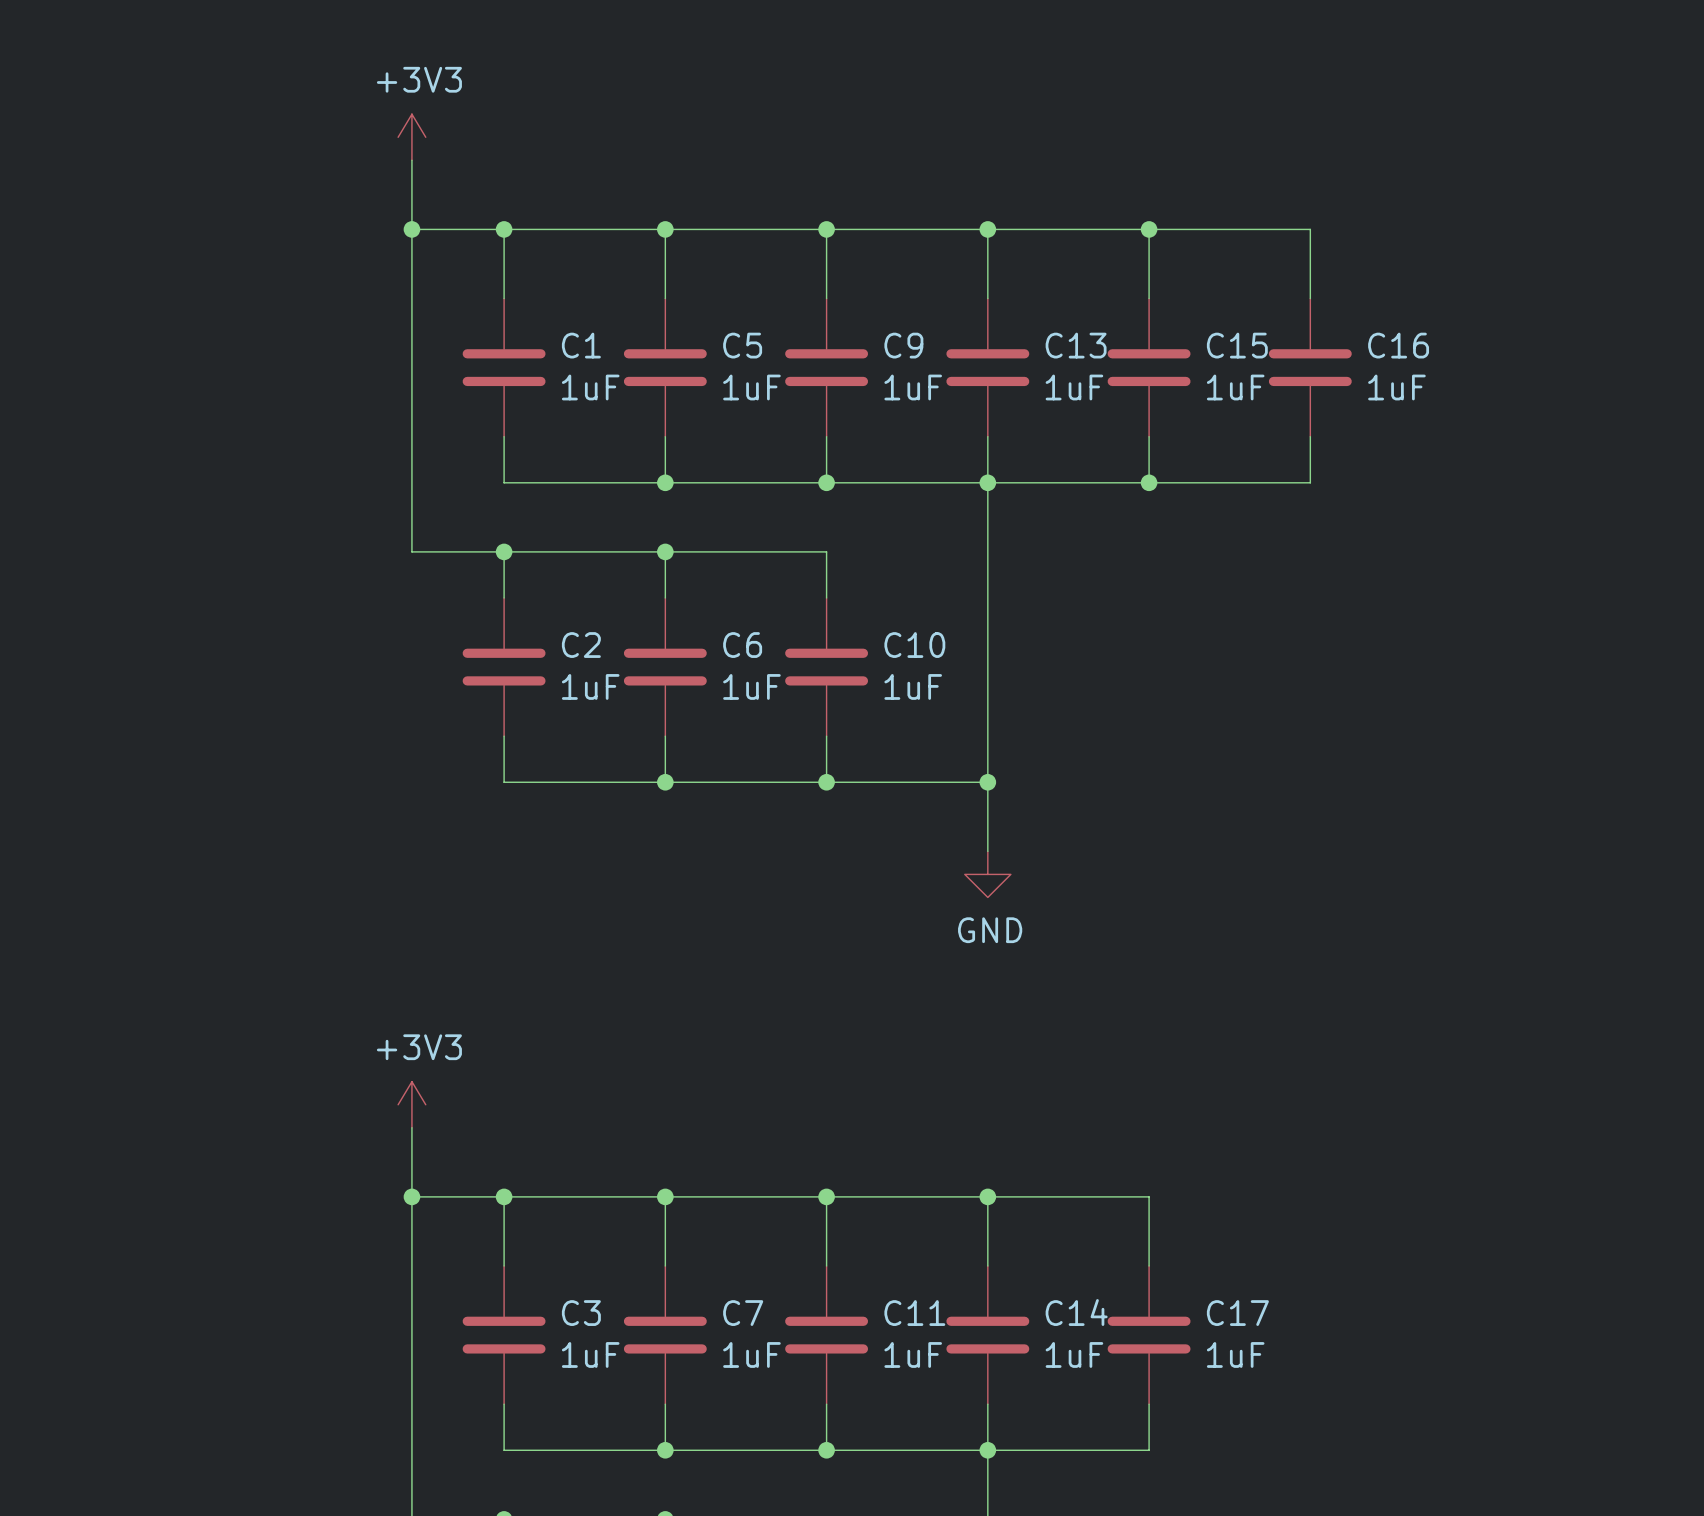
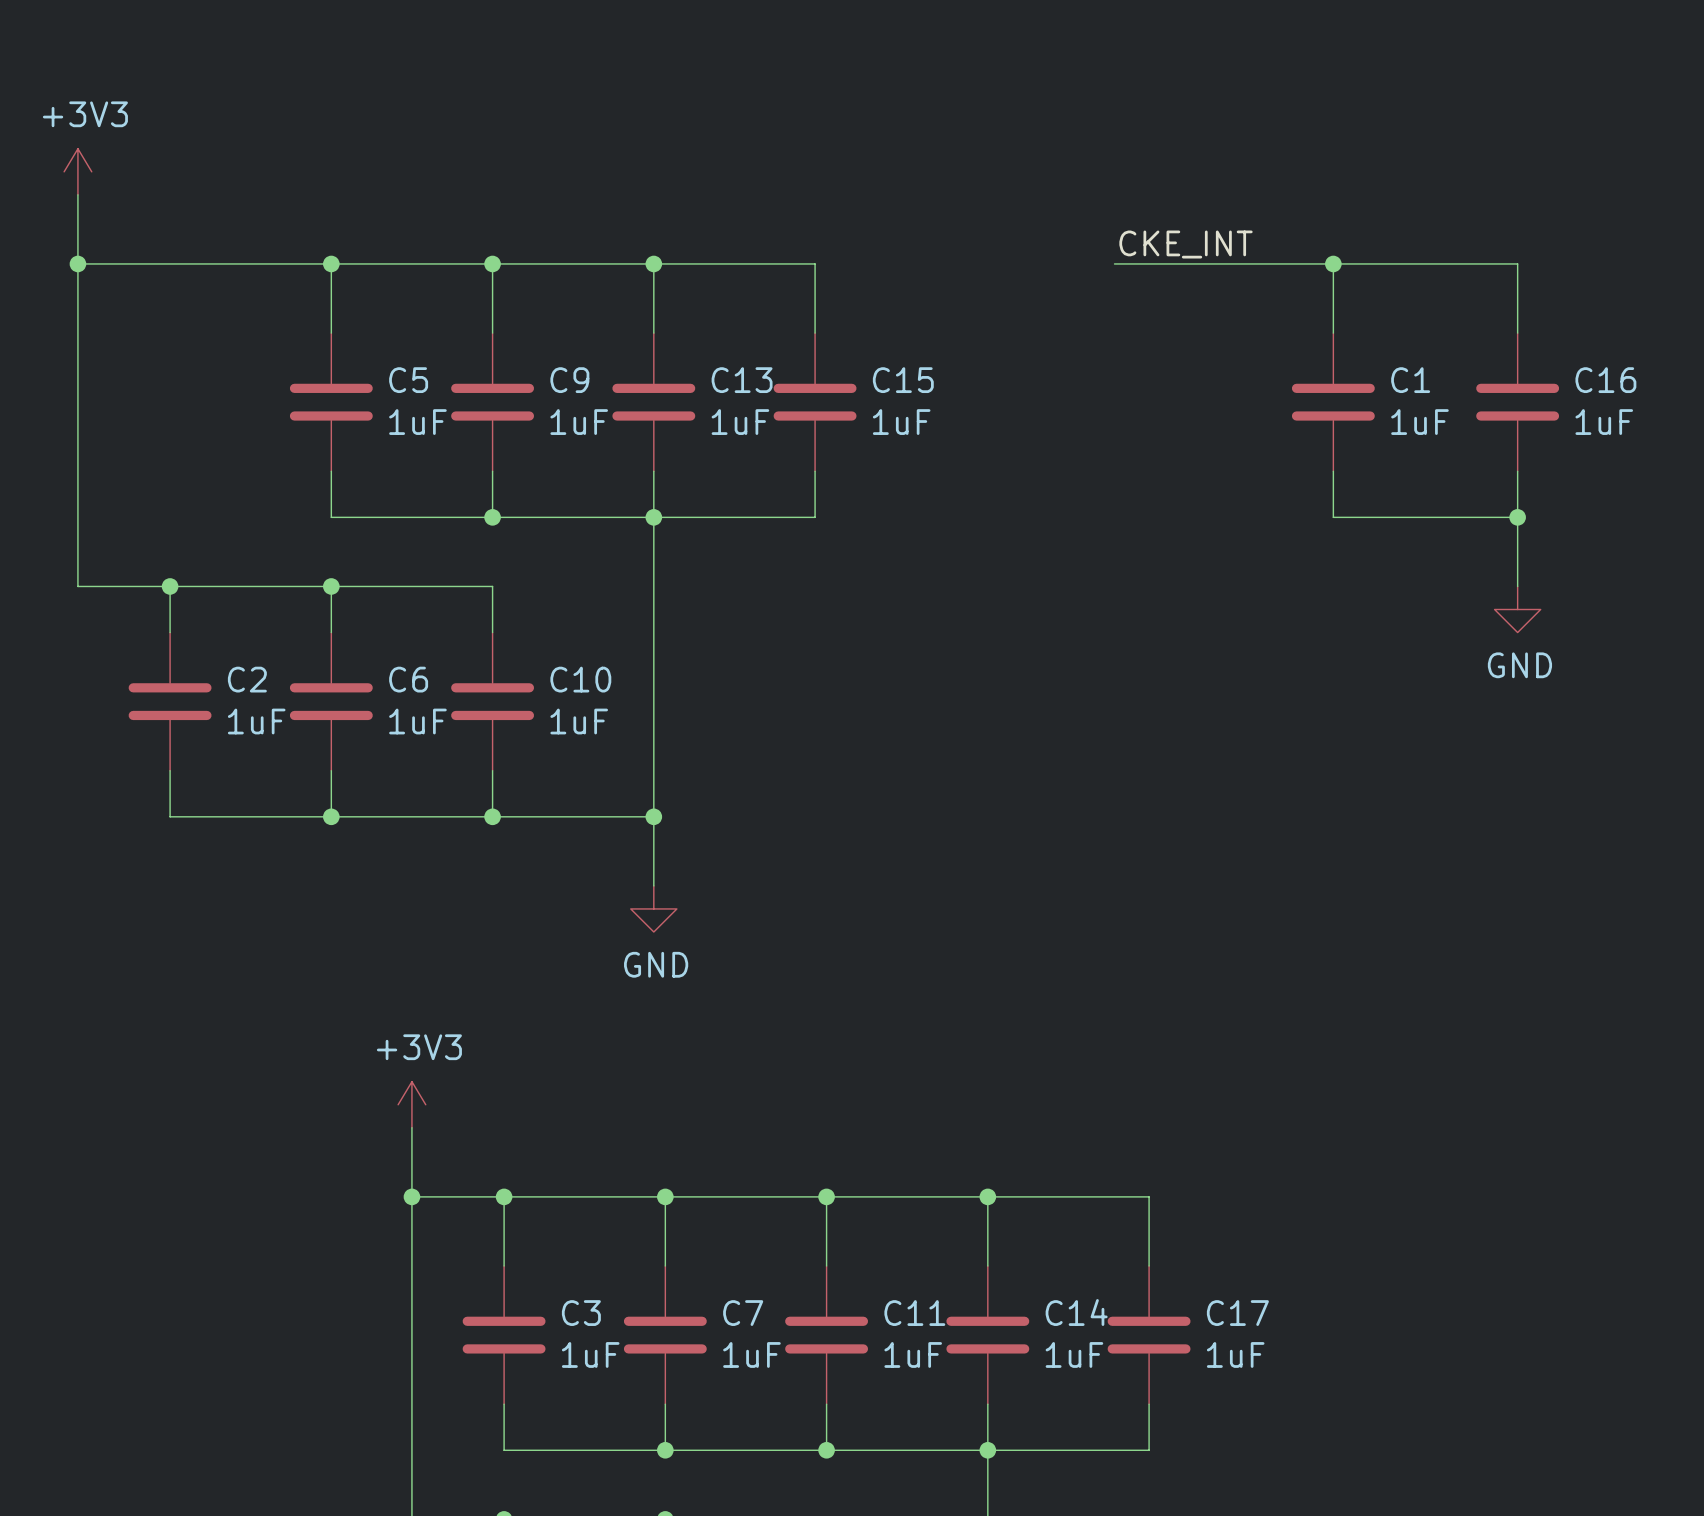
power symbol position: +3V3 (411, 137) -> +3V3 (77, 171)
wire: (411, 160) (411, 551) (826, 551) (826, 597) -> (77, 194) (77, 586) (492, 586) (492, 632)
wire: (411, 229) (1310, 229) (1310, 298) -> none
junction: (411, 229) -> none
wire: (504, 229) (504, 298) -> none
junction position: (504, 229) -> (492, 263)
wire: (665, 229) (665, 298) -> (331, 263) (331, 333)
junction position: (665, 229) -> (653, 263)
wire: (826, 229) (826, 298) -> (492, 263) (492, 333)
junction: (826, 229) -> none
wire: (987, 229) (987, 298) -> (653, 263) (653, 333)
junction: (987, 229) -> none
wire: (1149, 229) (1149, 298) -> (1333, 263) (1333, 333)
junction: (1149, 229) -> none
label: none -> CKE_INT (1185, 244)
wire: none -> (77, 263) (815, 263) (815, 333)
junction: none -> (77, 263)
junction: none -> (331, 263)
wire: none -> (1114, 263) (1517, 263) (1517, 333)
junction: none -> (1333, 263)
C1 position: (504, 367) -> (1333, 402)
C5 position: (665, 367) -> (331, 402)
C9 position: (826, 367) -> (492, 402)
C13 position: (987, 367) -> (653, 402)
C15 position: (1149, 367) -> (815, 402)
C16 position: (1310, 367) -> (1517, 402)
wire: (504, 436) (504, 482) (1310, 482) (1310, 436) -> none
wire: (665, 436) (665, 482) -> none
wire: (826, 436) (826, 482) -> (492, 471) (492, 517)
wire: (987, 436) (987, 851) -> (653, 471) (653, 885)
wire: (1149, 436) (1149, 482) -> none
wire: none -> (331, 471) (331, 517) (815, 517) (815, 471)
wire: none -> (1333, 471) (1333, 517) (1517, 517)
wire: none -> (1517, 471) (1517, 586)
junction: (665, 482) -> none
junction: (826, 482) -> none
junction: (987, 482) -> none
junction: (1149, 482) -> none
junction: none -> (653, 517)
junction: none -> (1517, 517)
wire: (504, 551) (504, 597) -> (170, 586) (170, 632)
junction position: (504, 551) -> (492, 517)
wire: (665, 551) (665, 597) -> (331, 586) (331, 632)
junction: (665, 551) -> none
junction: none -> (170, 586)
junction: none -> (331, 586)
power symbol: none -> GND (1517, 609)
C2 position: (504, 667) -> (170, 701)
C6 position: (665, 667) -> (331, 701)
C10 position: (826, 667) -> (492, 701)
wire: (504, 736) (504, 782) (987, 782) -> (170, 770) (170, 816) (653, 816)
wire: (665, 736) (665, 782) -> (331, 770) (331, 816)
wire: (826, 736) (826, 782) -> (492, 770) (492, 816)
junction position: (665, 782) -> (653, 816)
junction: (826, 782) -> none
junction: (987, 782) -> none
junction: none -> (331, 816)
junction: none -> (492, 816)
power symbol: GND (987, 874) -> none
power symbol: none -> GND (653, 908)

